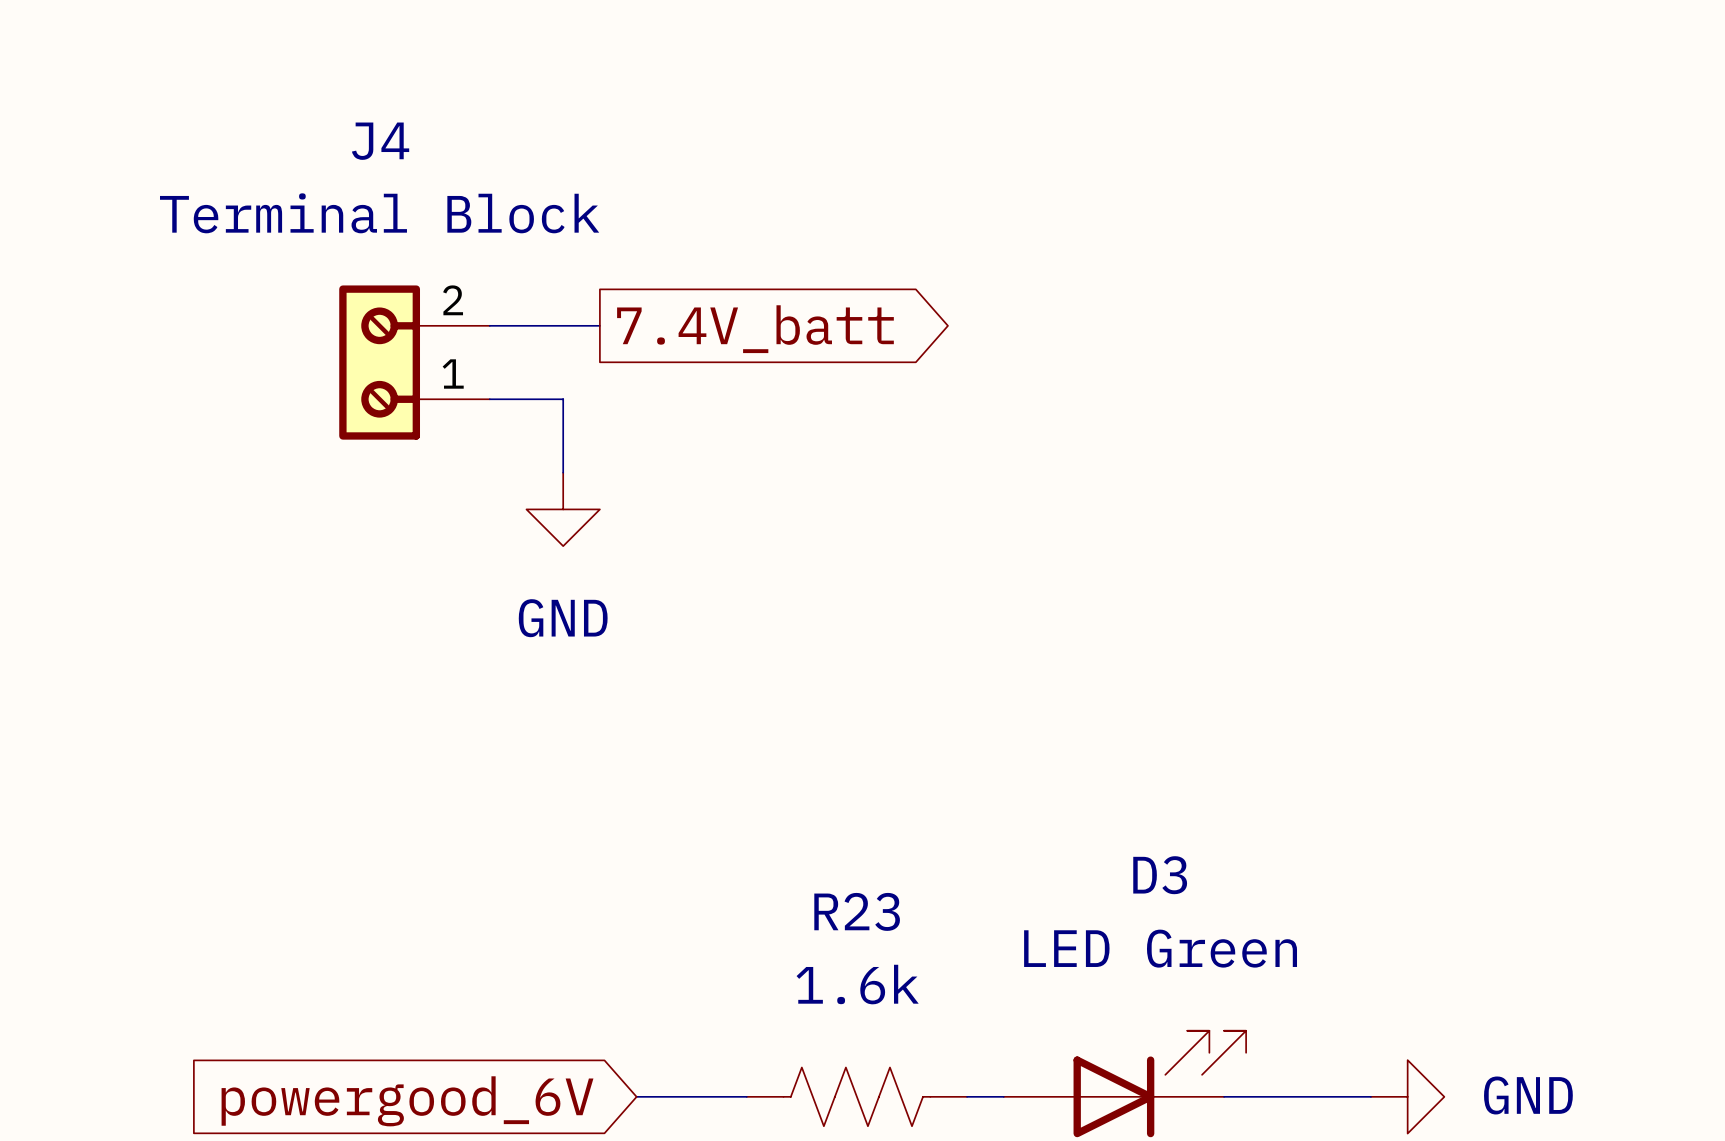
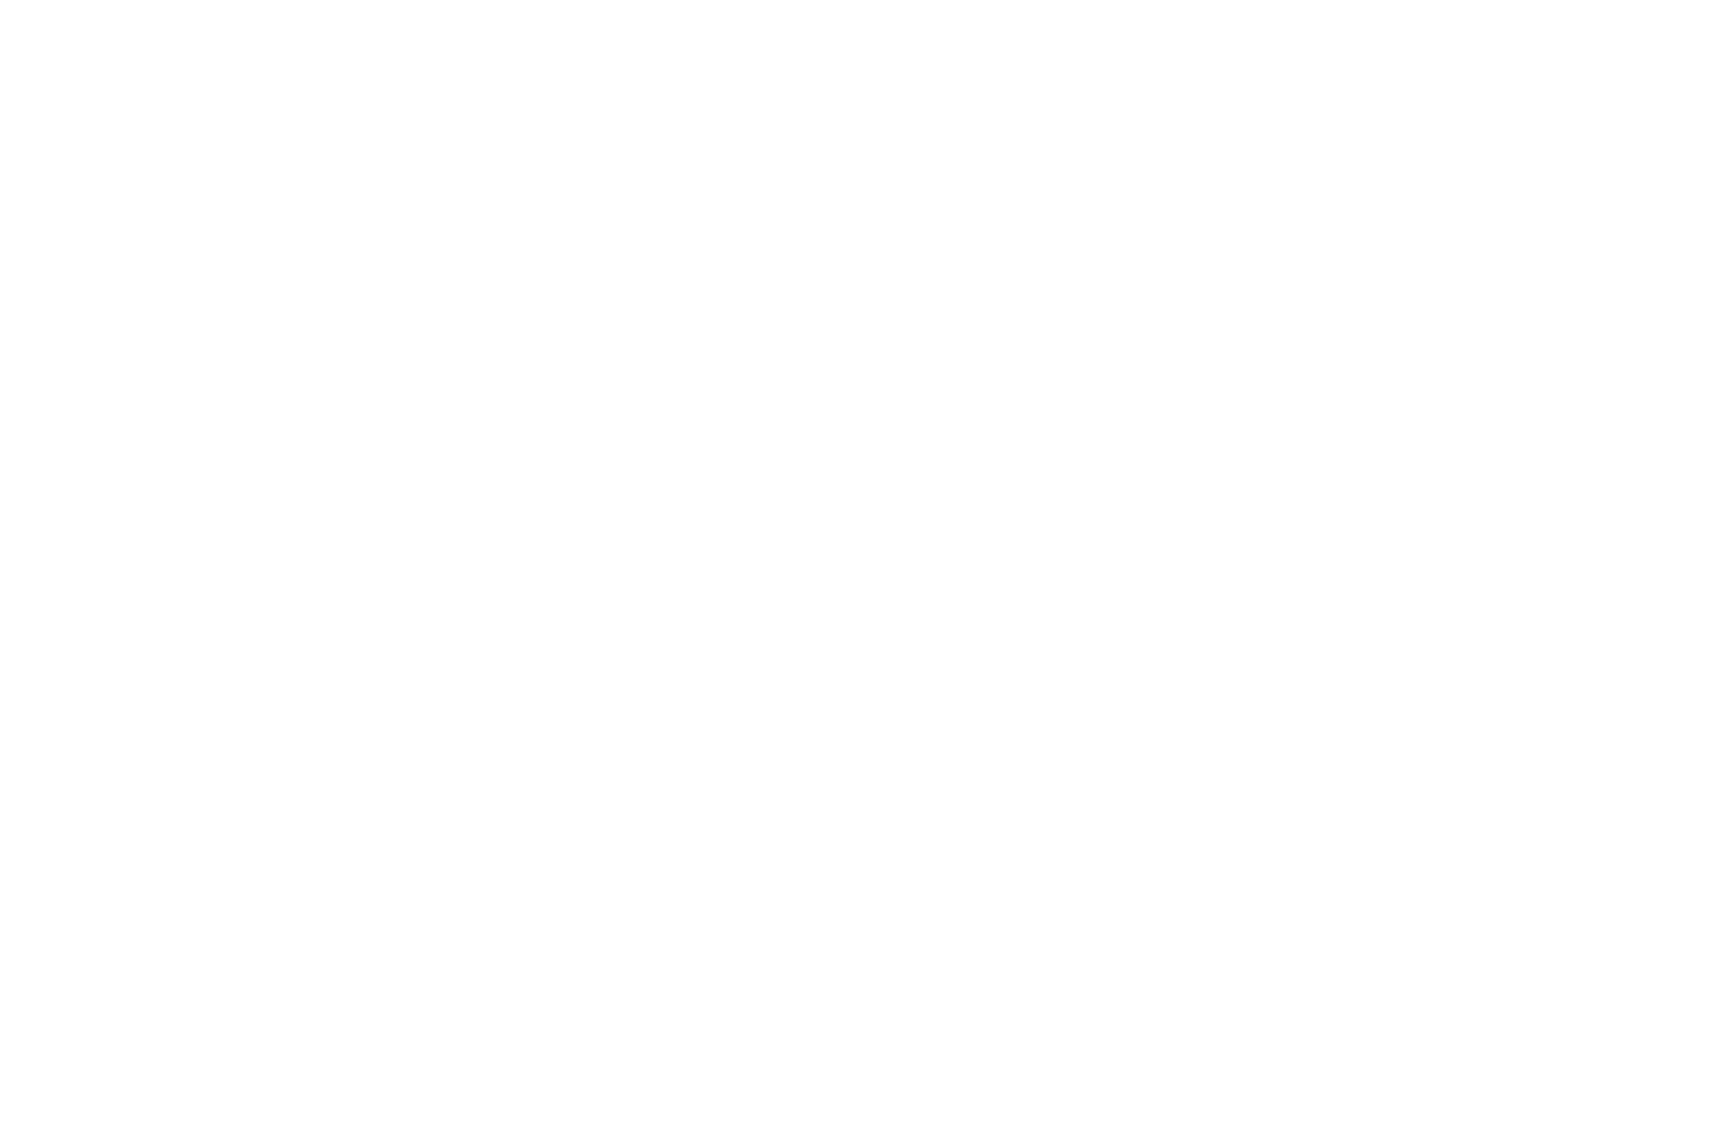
wire: (489, 325) (599, 325) -> none
global label: 7.4V_batt (755, 329) -> none
J4: Terminal Block (414, 362) -> none
wire: (489, 399) (563, 399) (563, 472) -> none
power symbol: GND (563, 509) -> none
D3: LED Green (1124, 1084) -> none
wire: (636, 1096) (746, 1096) -> none
R23: 1.6k (856, 1096) -> none
wire: (967, 1096) (1003, 1096) -> none
wire: (1224, 1096) (1370, 1096) -> none
power symbol: GND (1407, 1096) -> none
global label: powergood_6V (407, 1101) -> none

